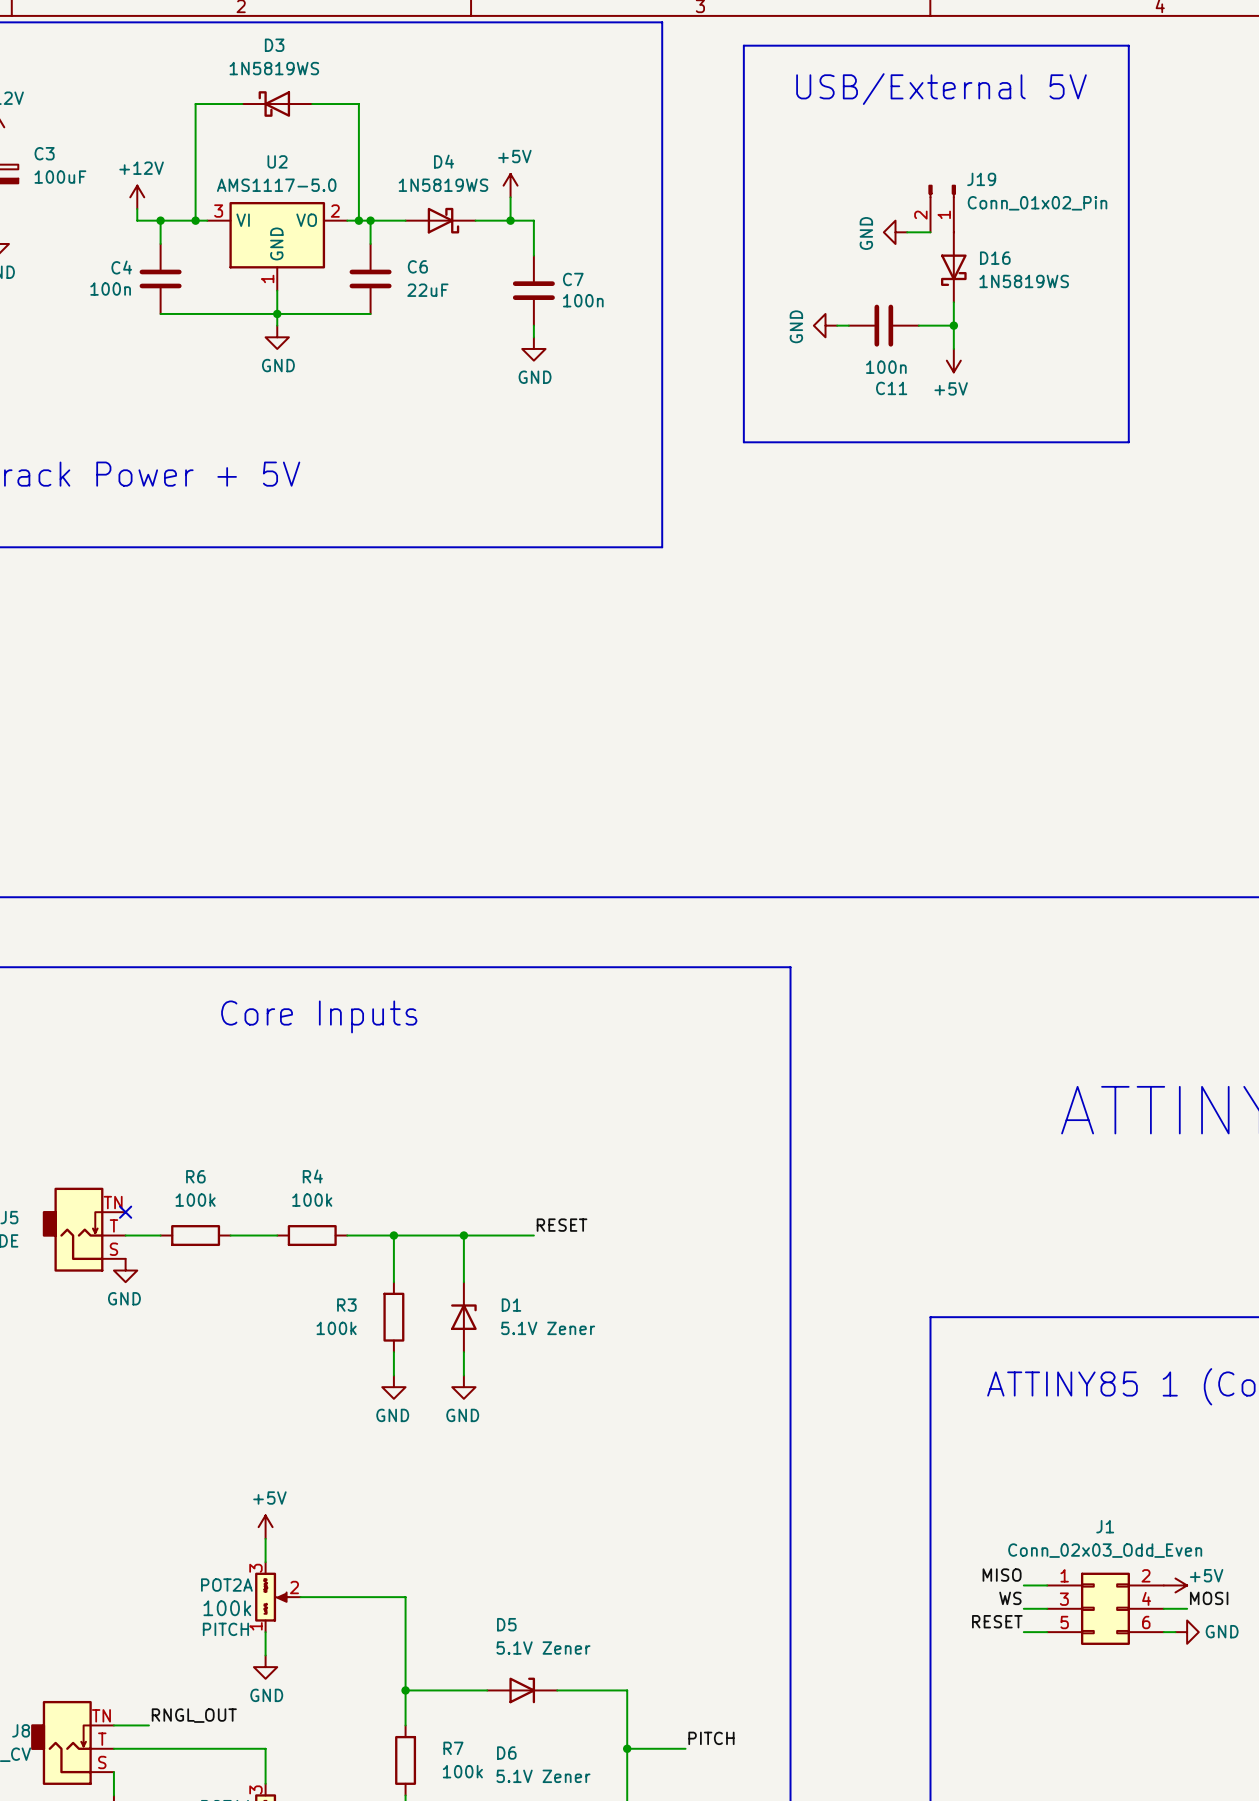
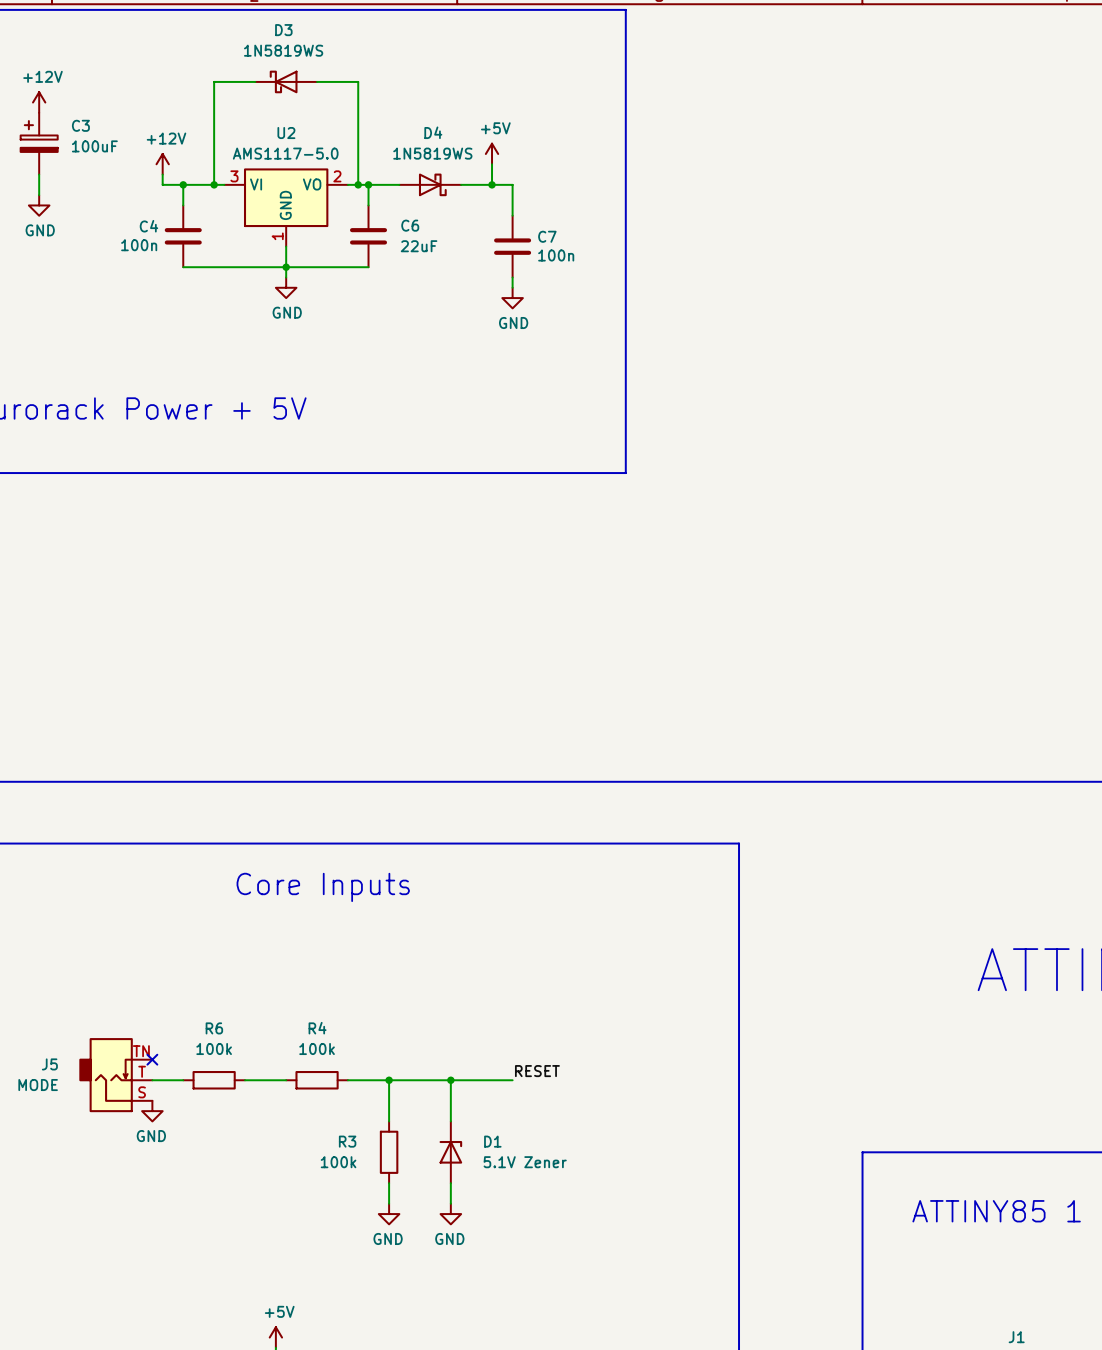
line: (743, 45) (1128, 45) (1128, 442) (743, 442) (743, 45) -> none
text: USB/External 5V (941, 89) -> none
J19: Conn_01x02_Pin (942, 208) -> none
power symbol: GND (895, 232) -> none
wire: (907, 232) (930, 232) -> none
D16: 1N5819WS (953, 267) -> none
wire: (953, 302) (953, 348) -> none
power symbol: GND (825, 325) -> none
wire: (837, 325) (848, 325) -> none
C11: 100n (883, 325) -> none
wire: (918, 325) (953, 325) -> none
junction: (953, 325) -> none
power symbol: +5V (953, 360) -> none

